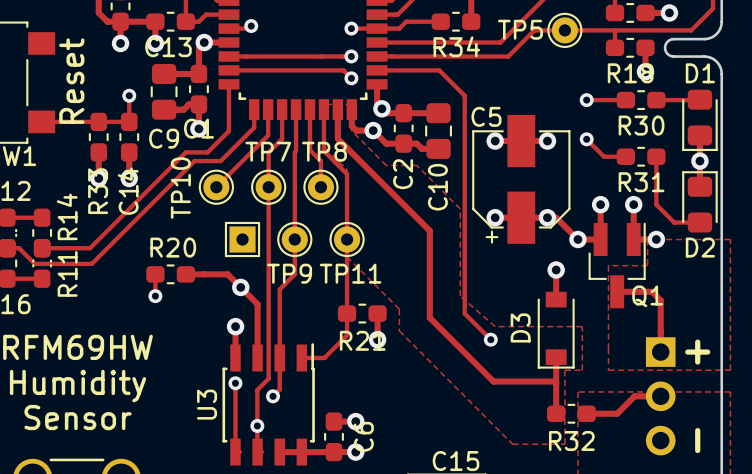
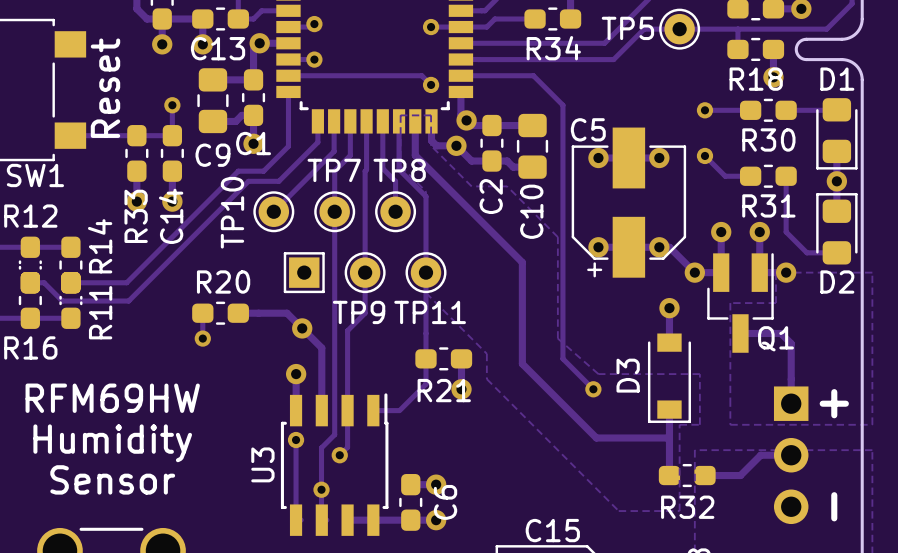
track: (251, 56) (351, 56) -> none
via: none -> (314, 59)
via: (351, 56) -> none

